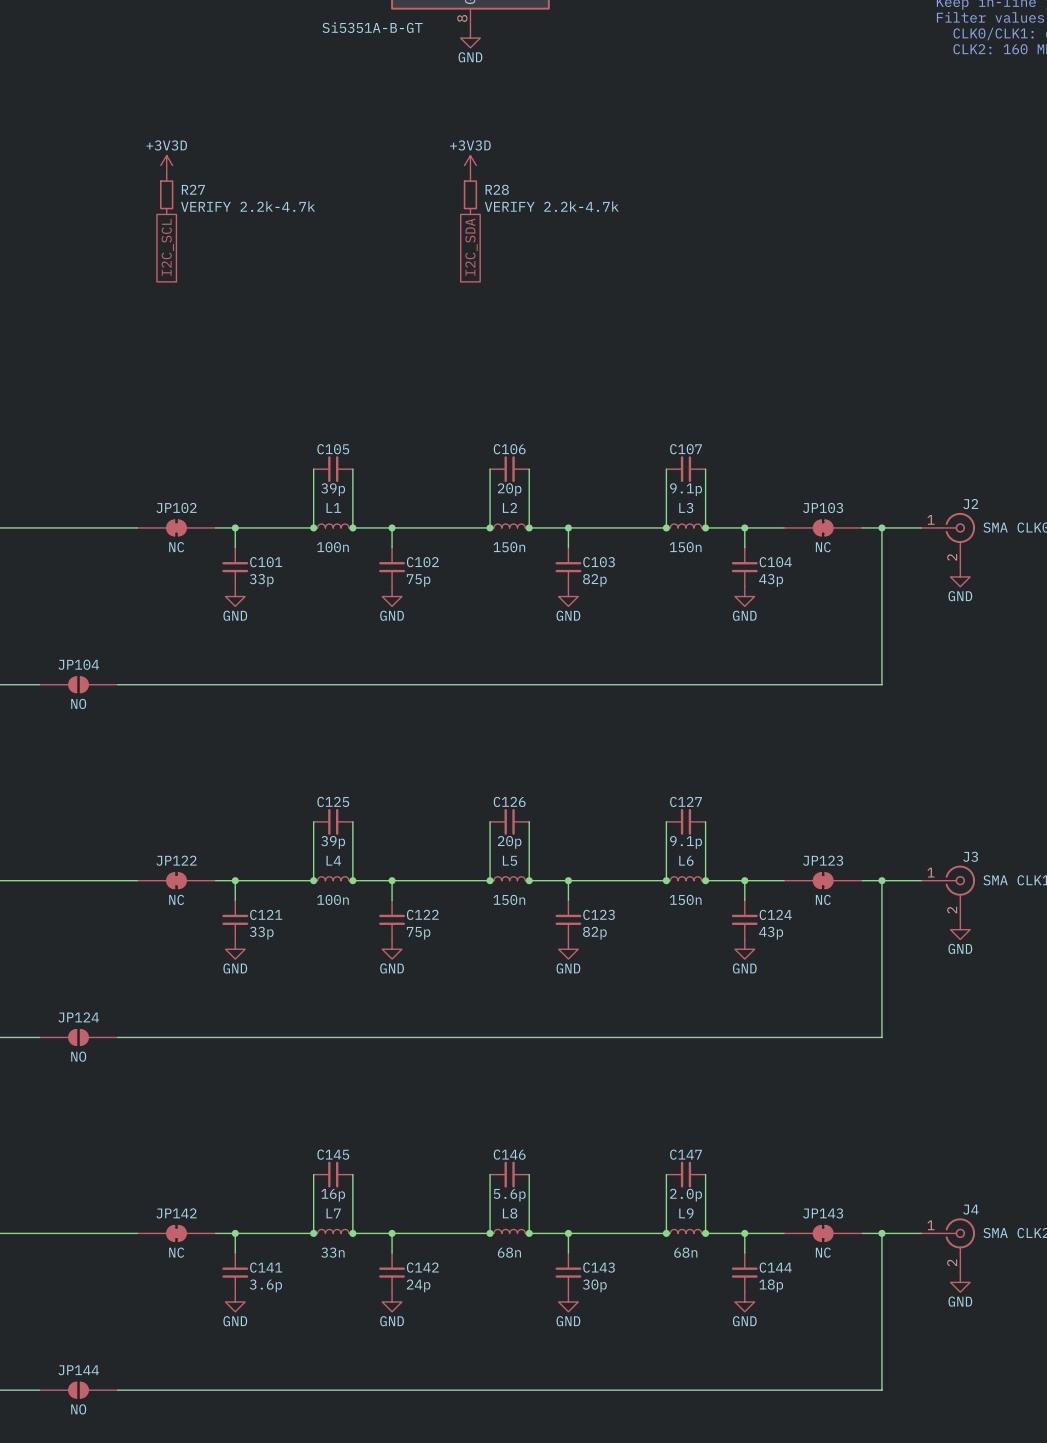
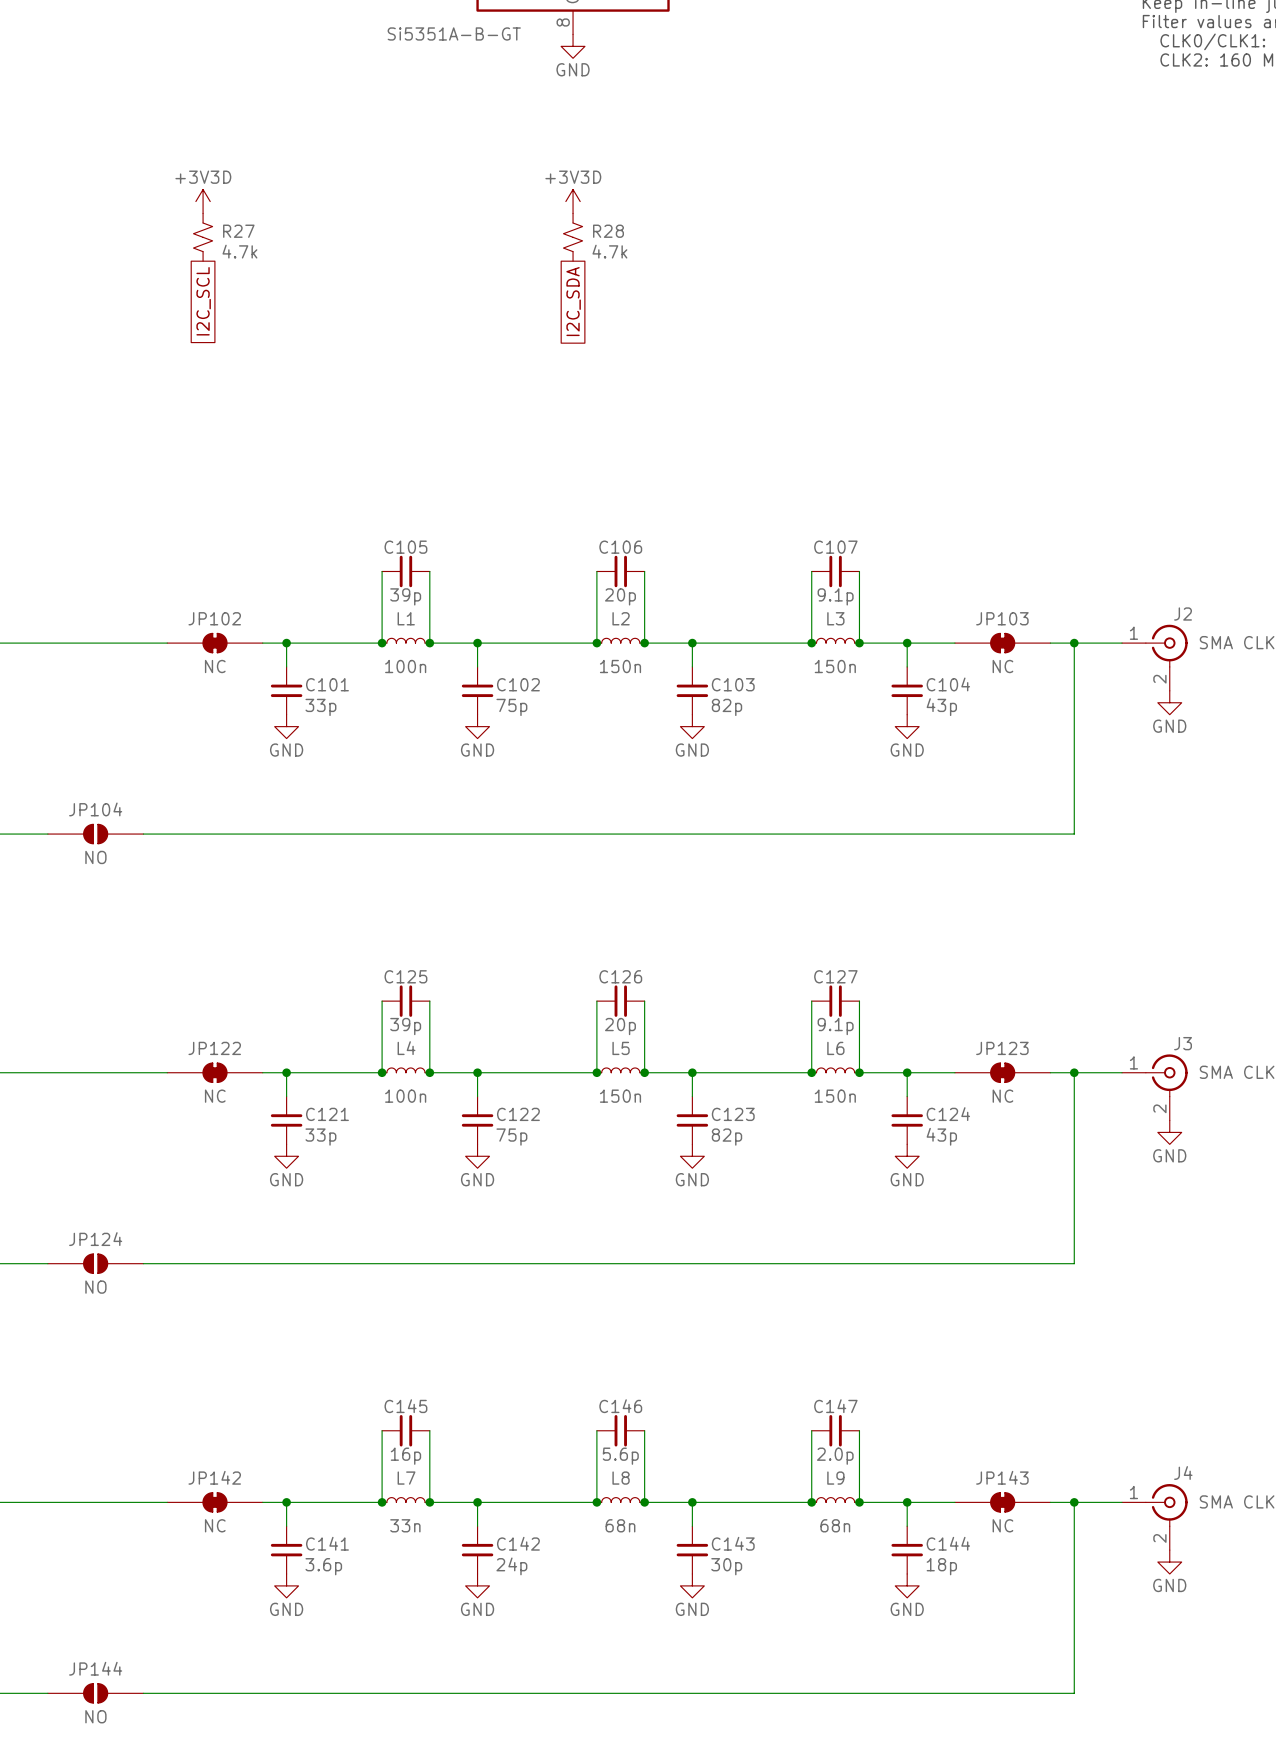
R27 symbol: [160, 175, 174, 215] -> [193, 213, 213, 262]
R28 symbol: [463, 175, 478, 215] -> [563, 213, 583, 262]
R27 value: VERIFY 2.2k-4.7k (248, 206) -> 4.7k (239, 251)
R28 value: VERIFY 2.2k-4.7k (551, 206) -> 4.7k (609, 251)

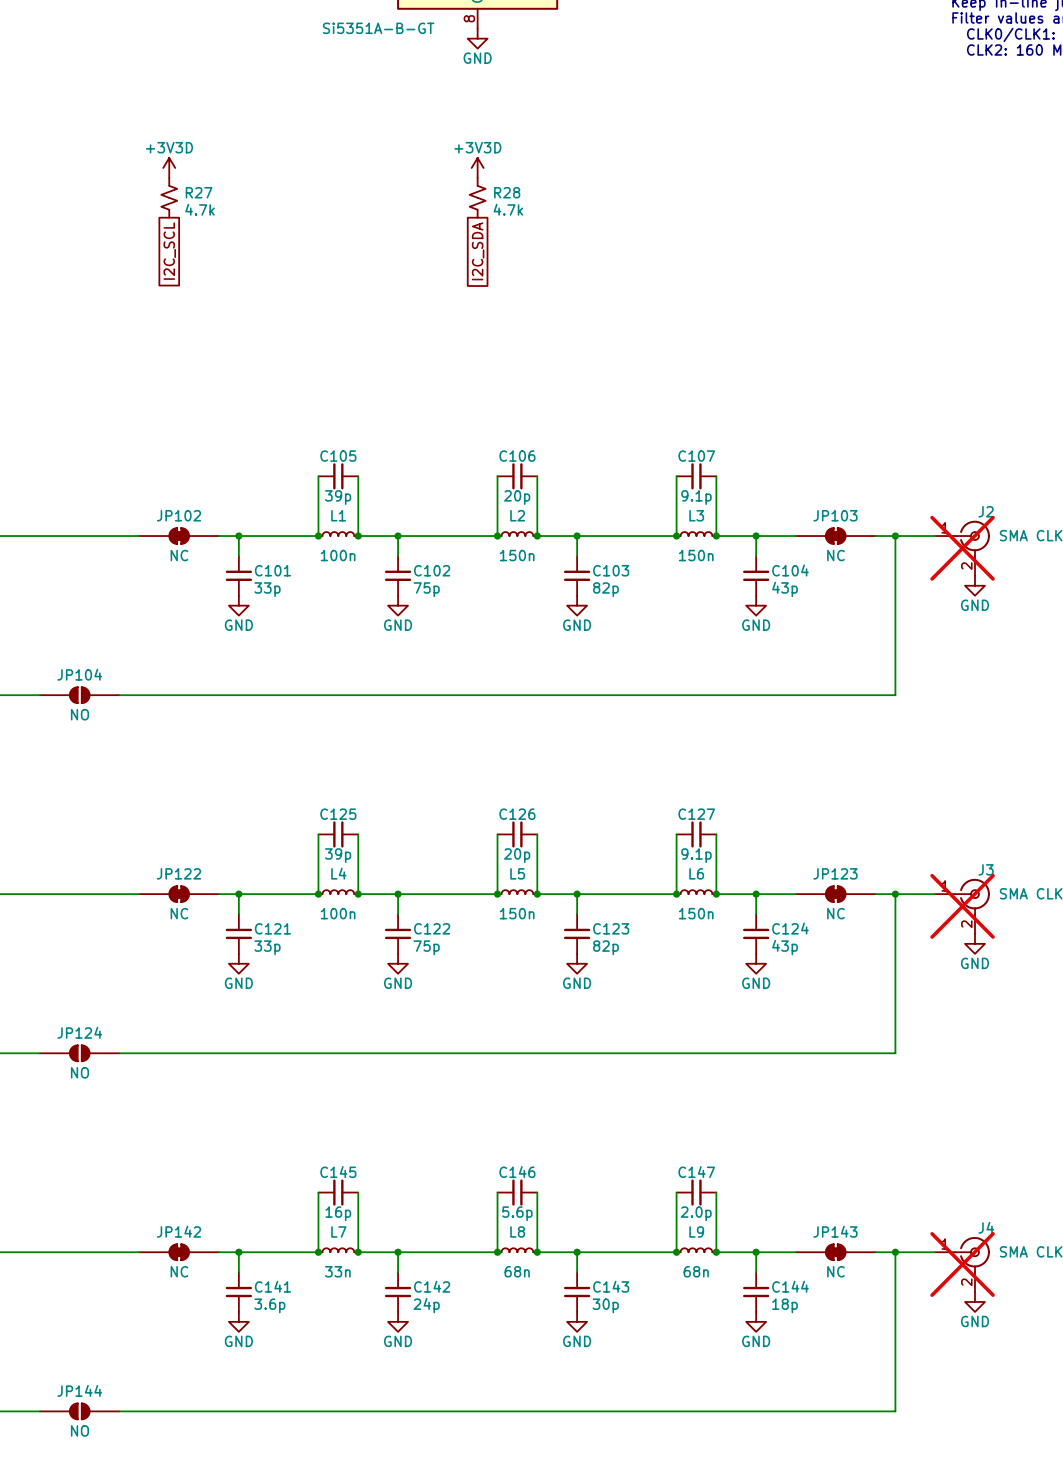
J2 do-not-place cross: none -> (962, 548)
J3 do-not-place cross: none -> (962, 906)
J4 do-not-place cross: none -> (962, 1264)

